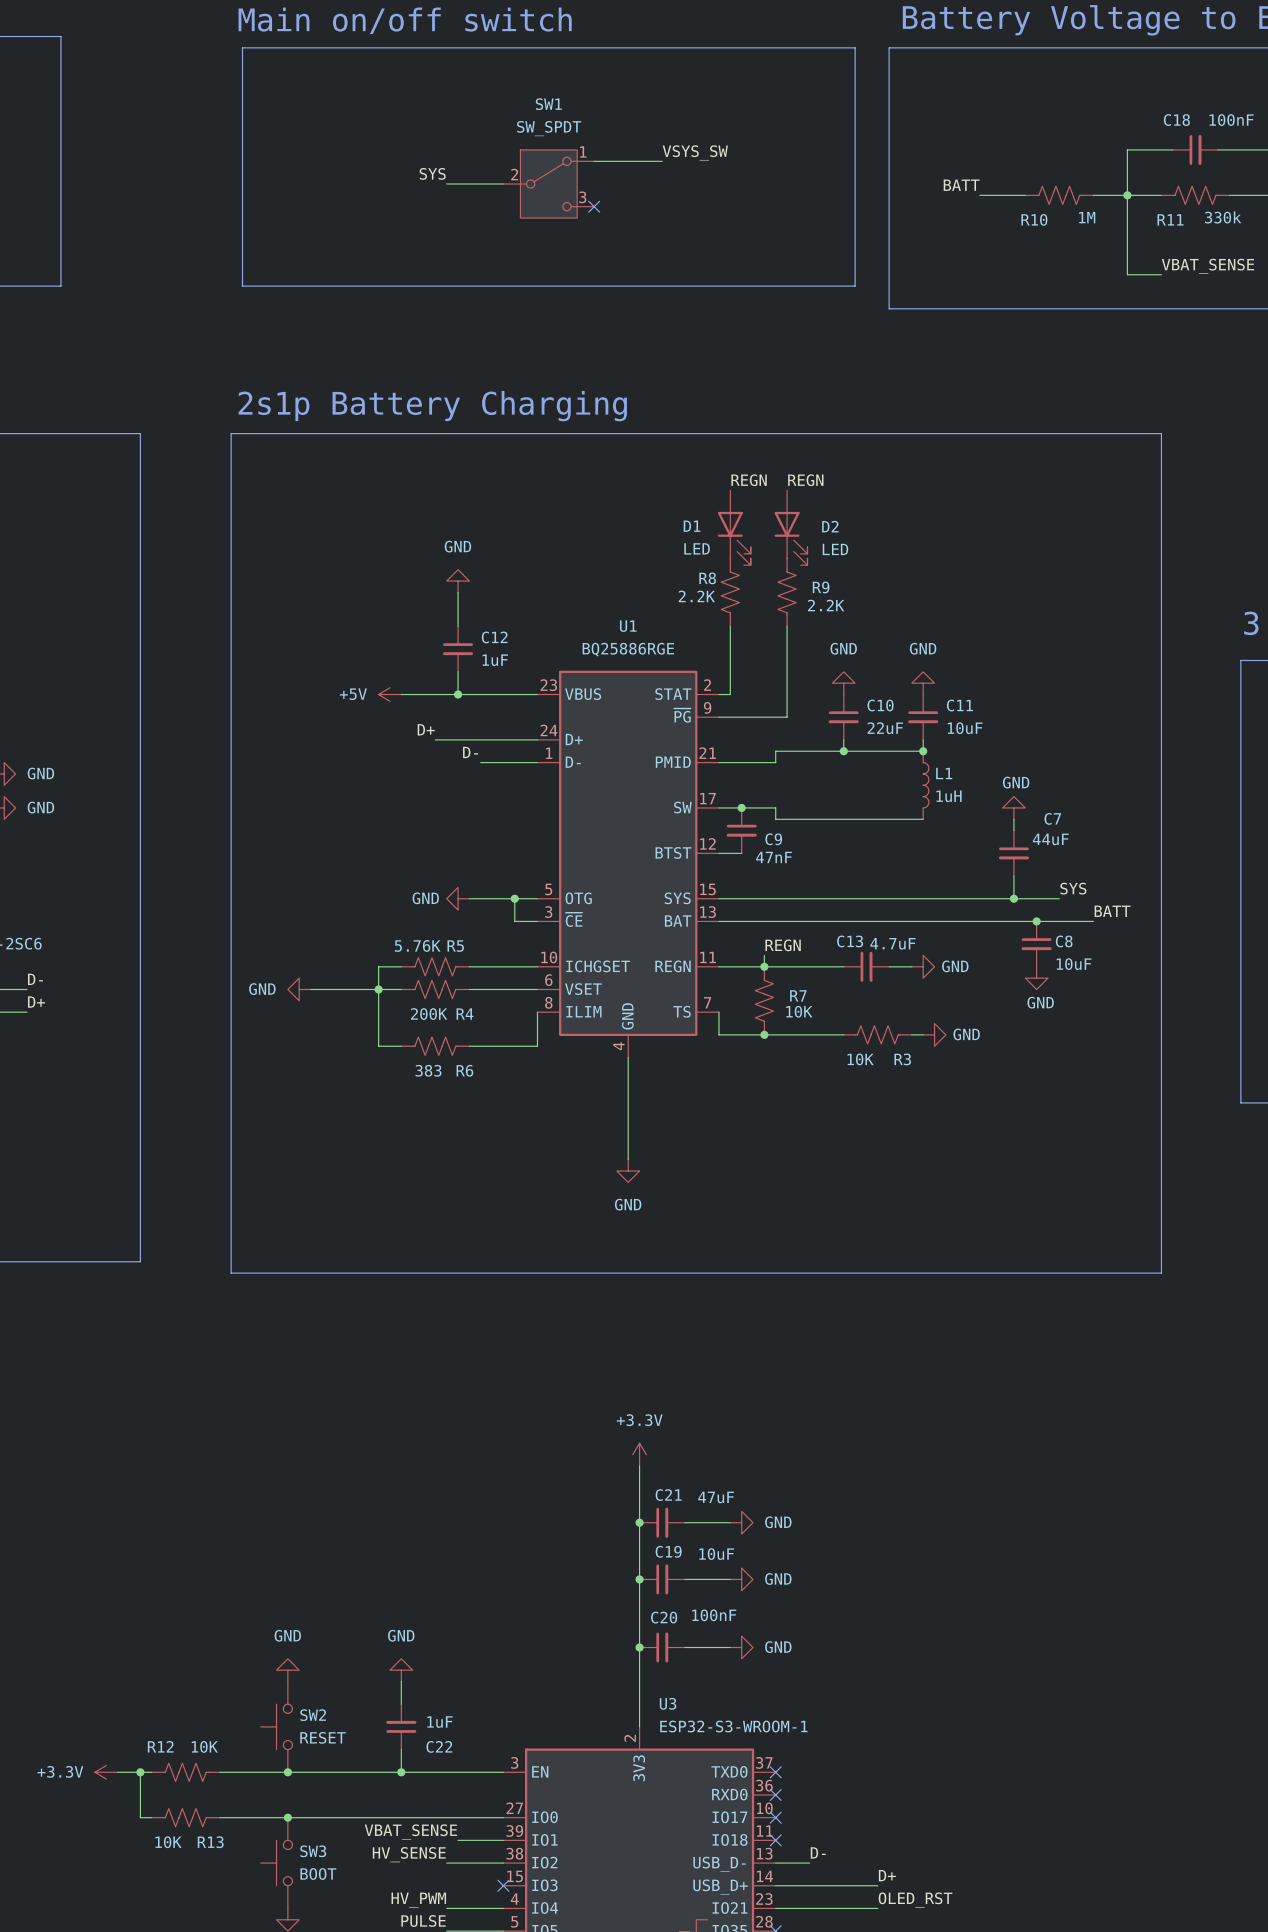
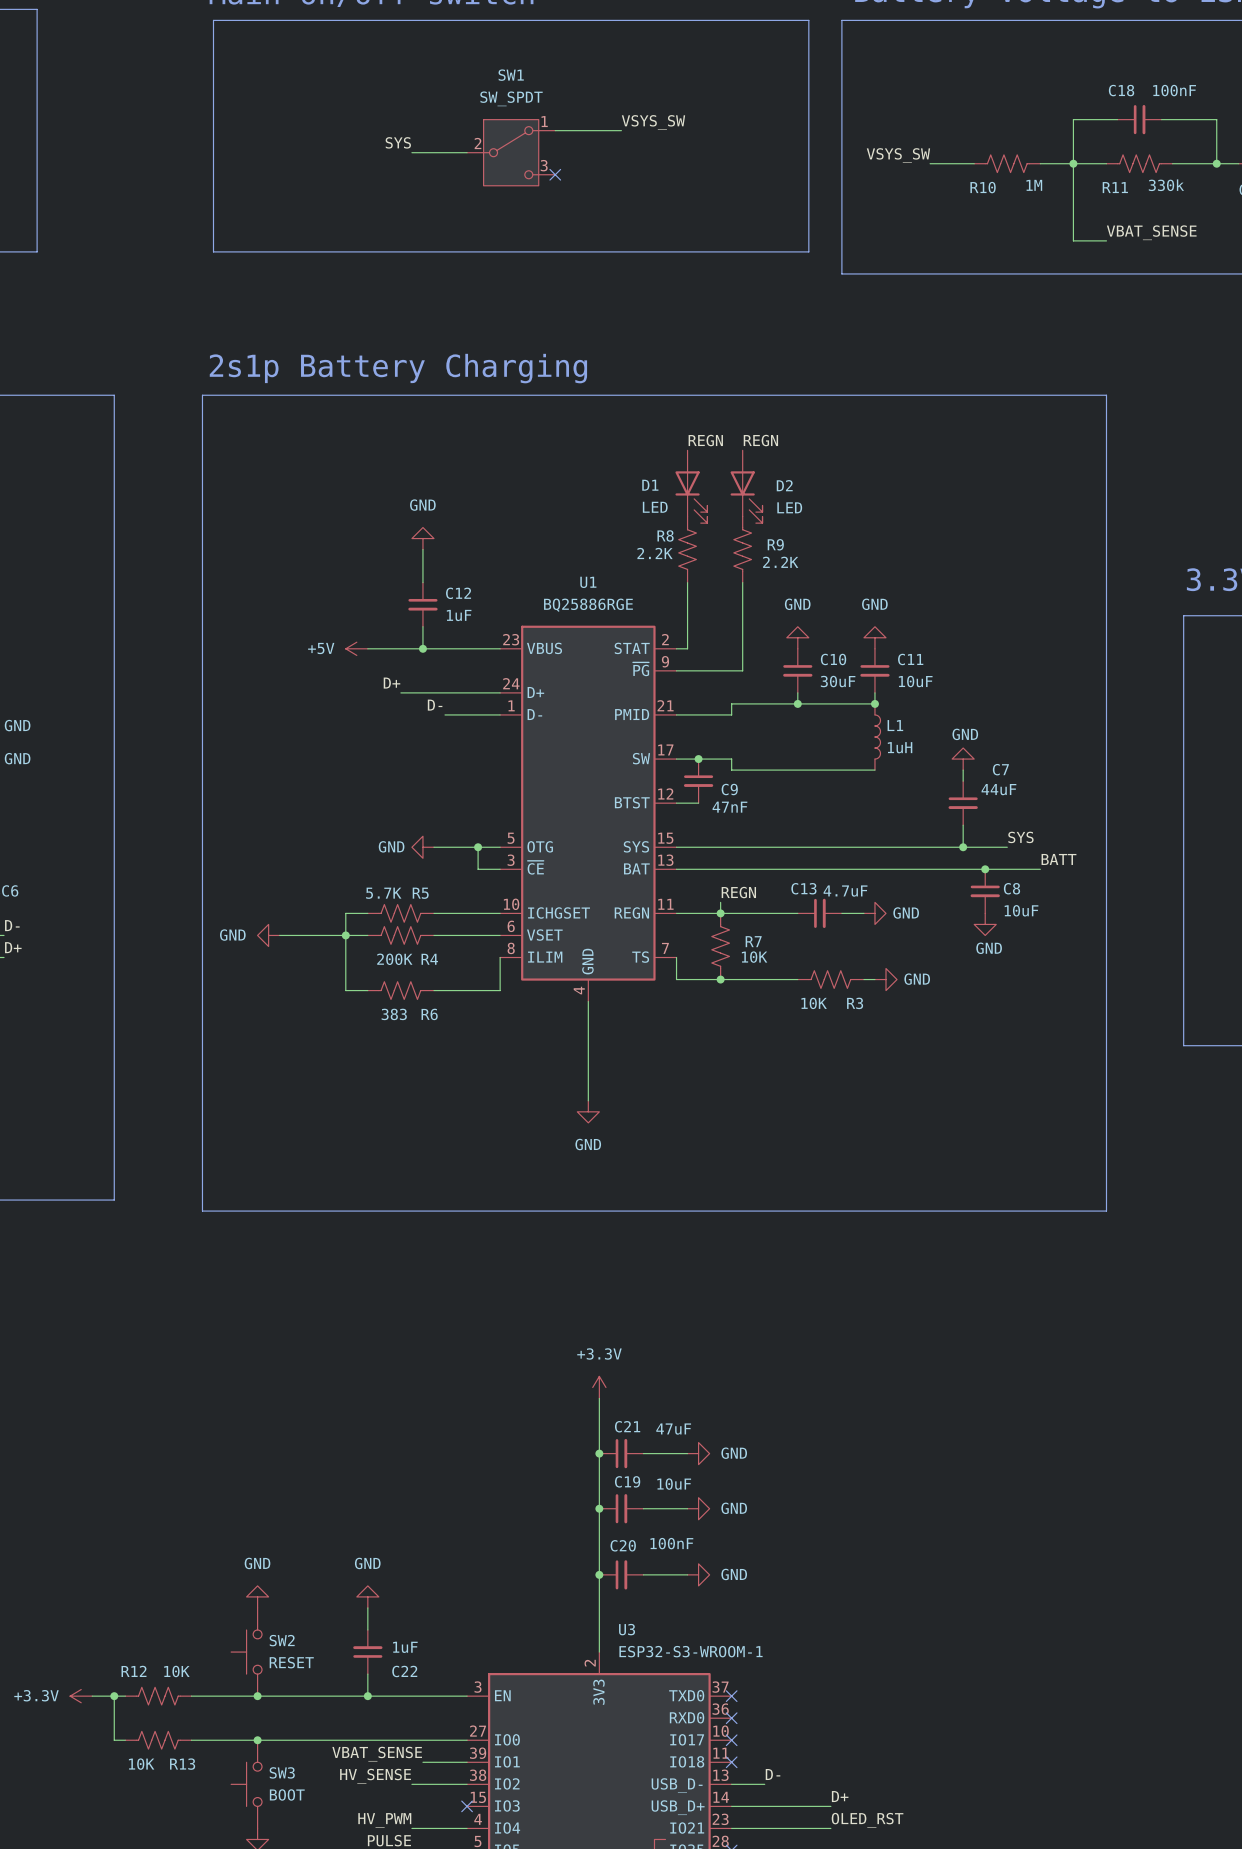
label: BATT (961, 185) -> VSYS_SW (898, 155)
C10 value: 22uF (885, 728) -> 30uF (838, 681)
R5 value: 5.76K (417, 945) -> 5.7K (383, 893)

